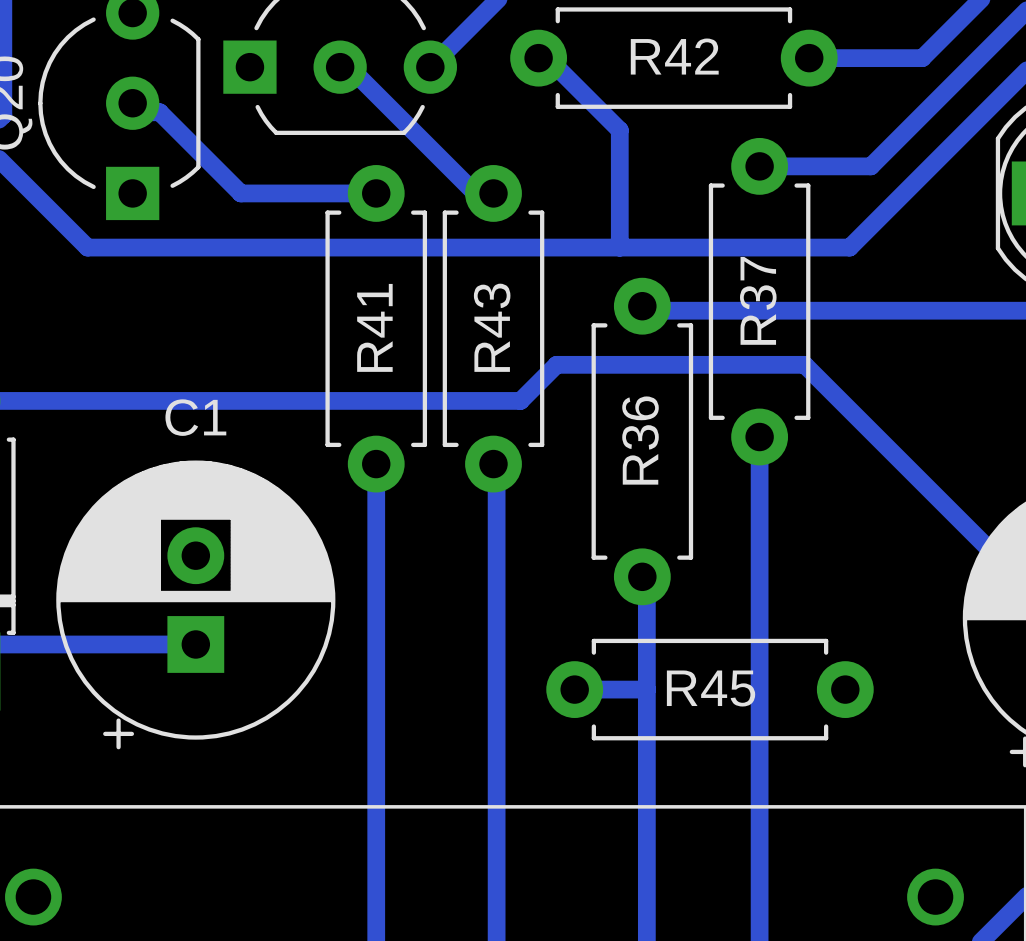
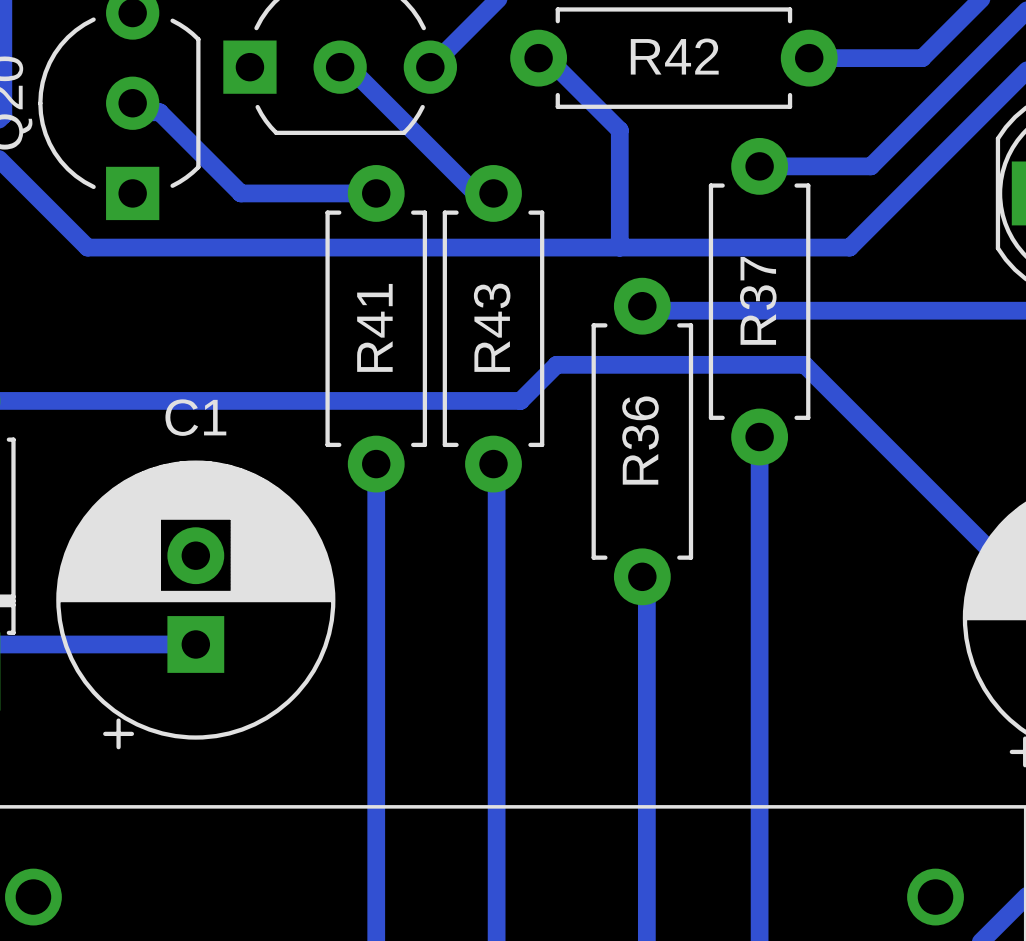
bottom track: (574, 689) (646, 689) -> none
R45: (710, 689) -> none

